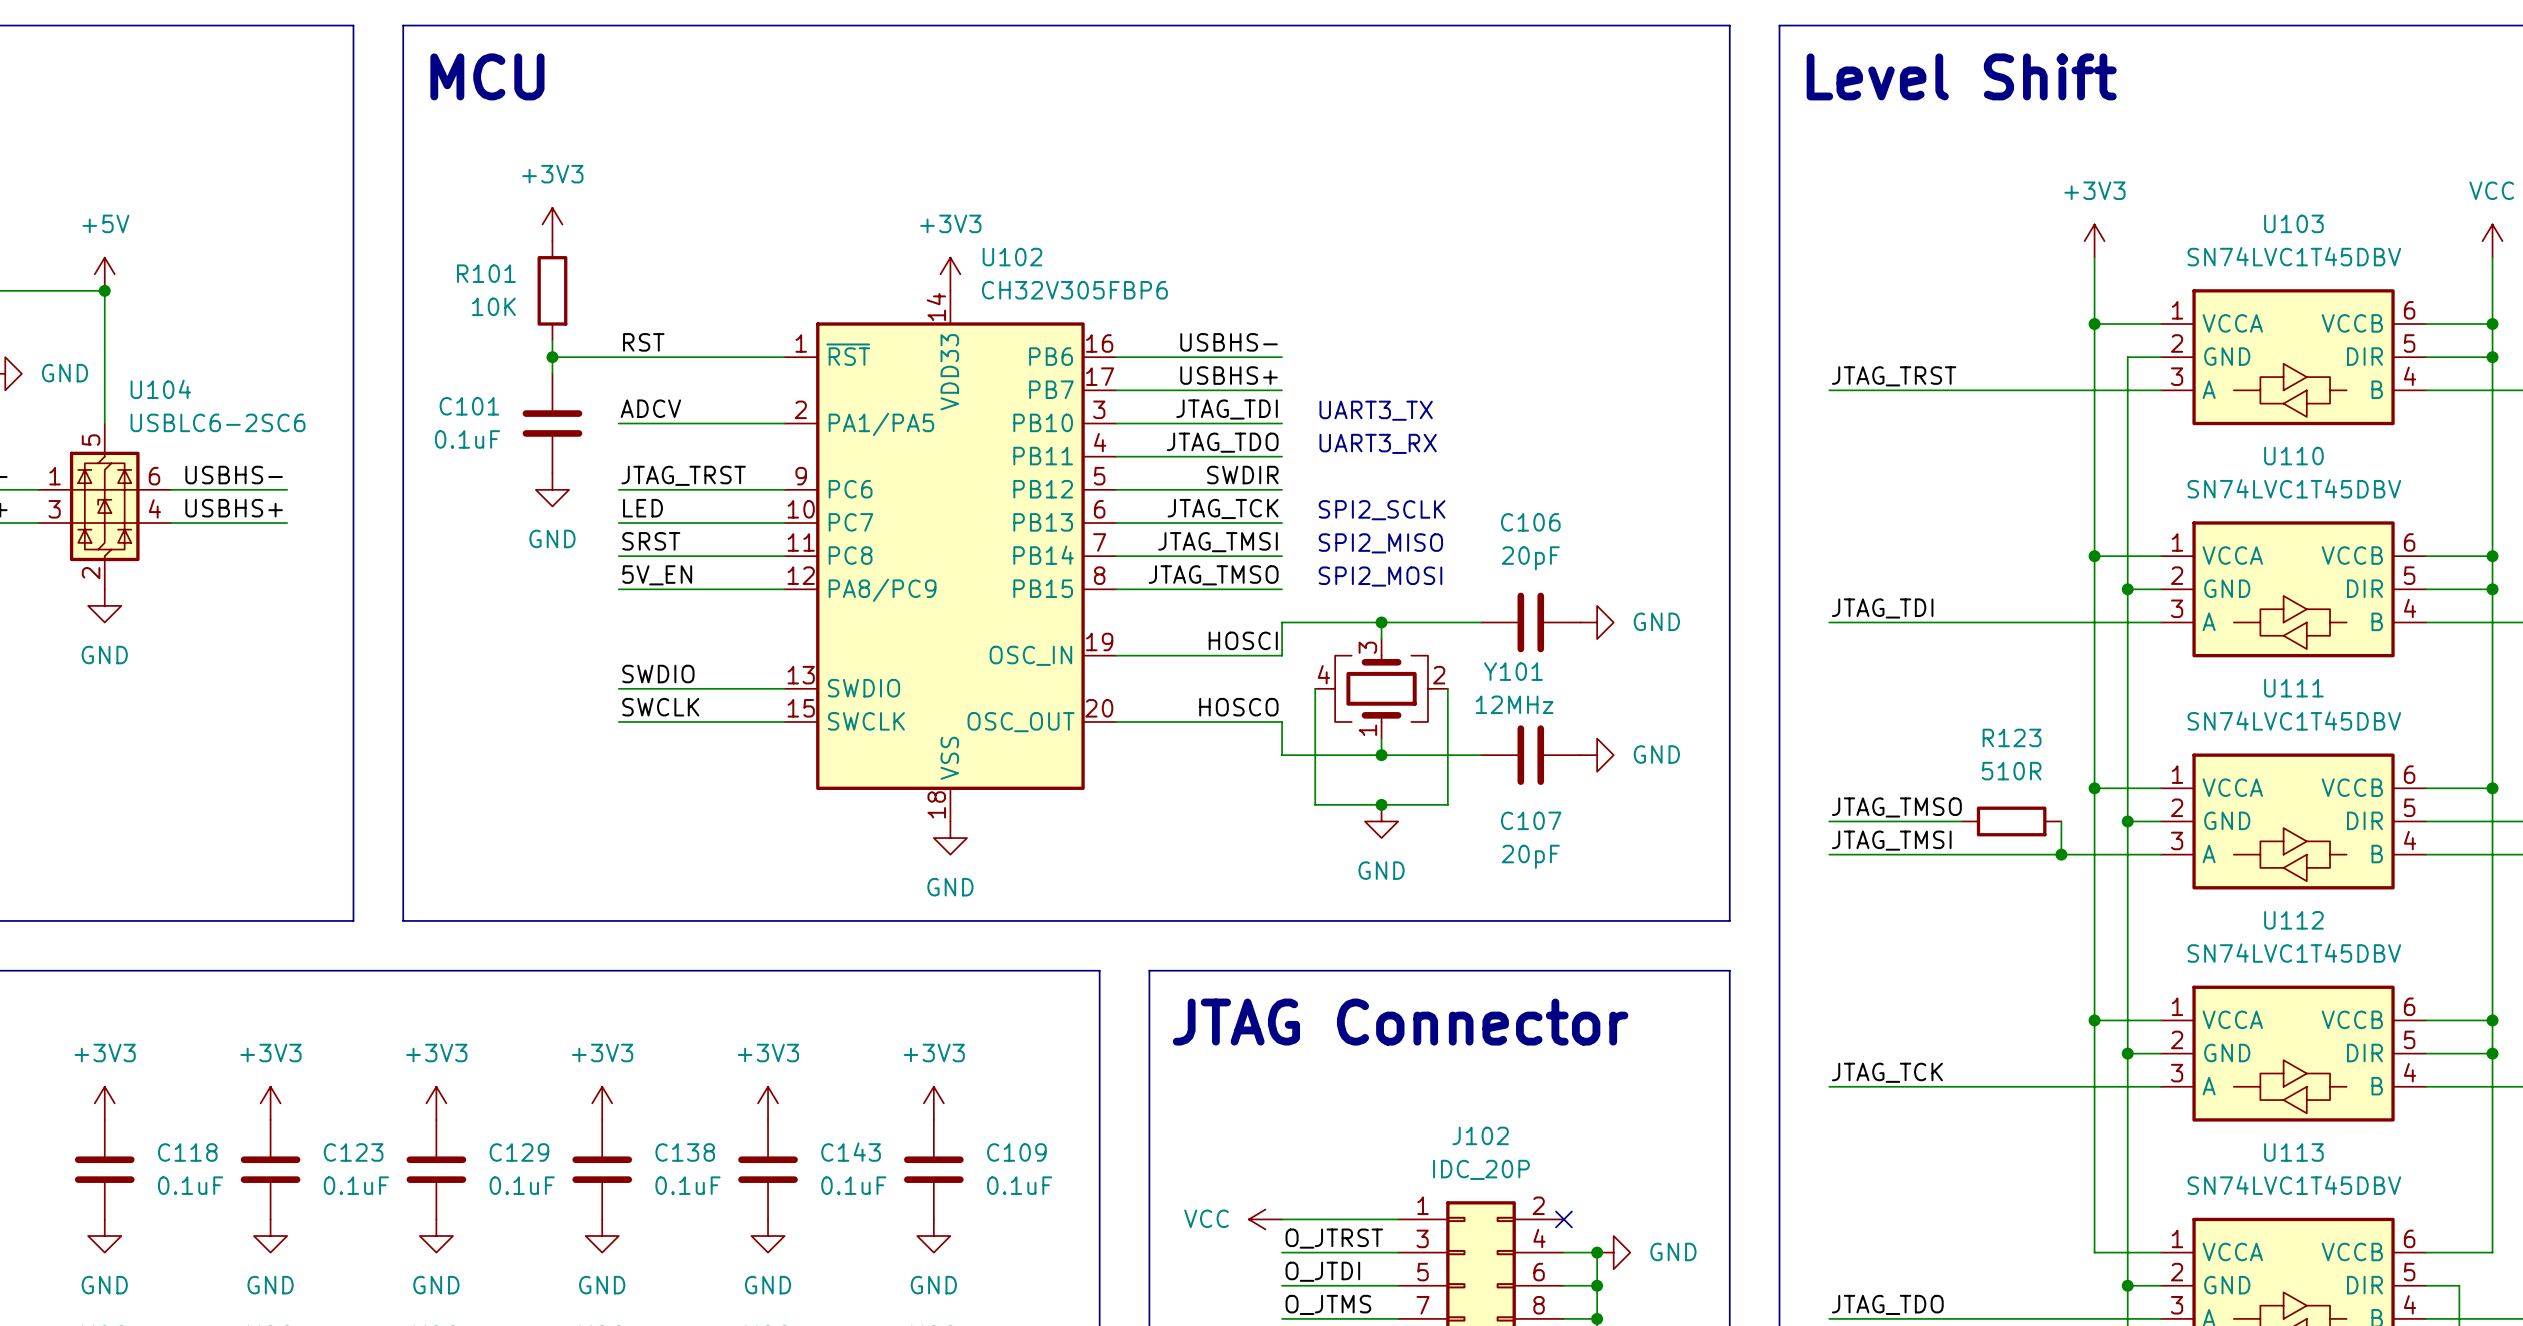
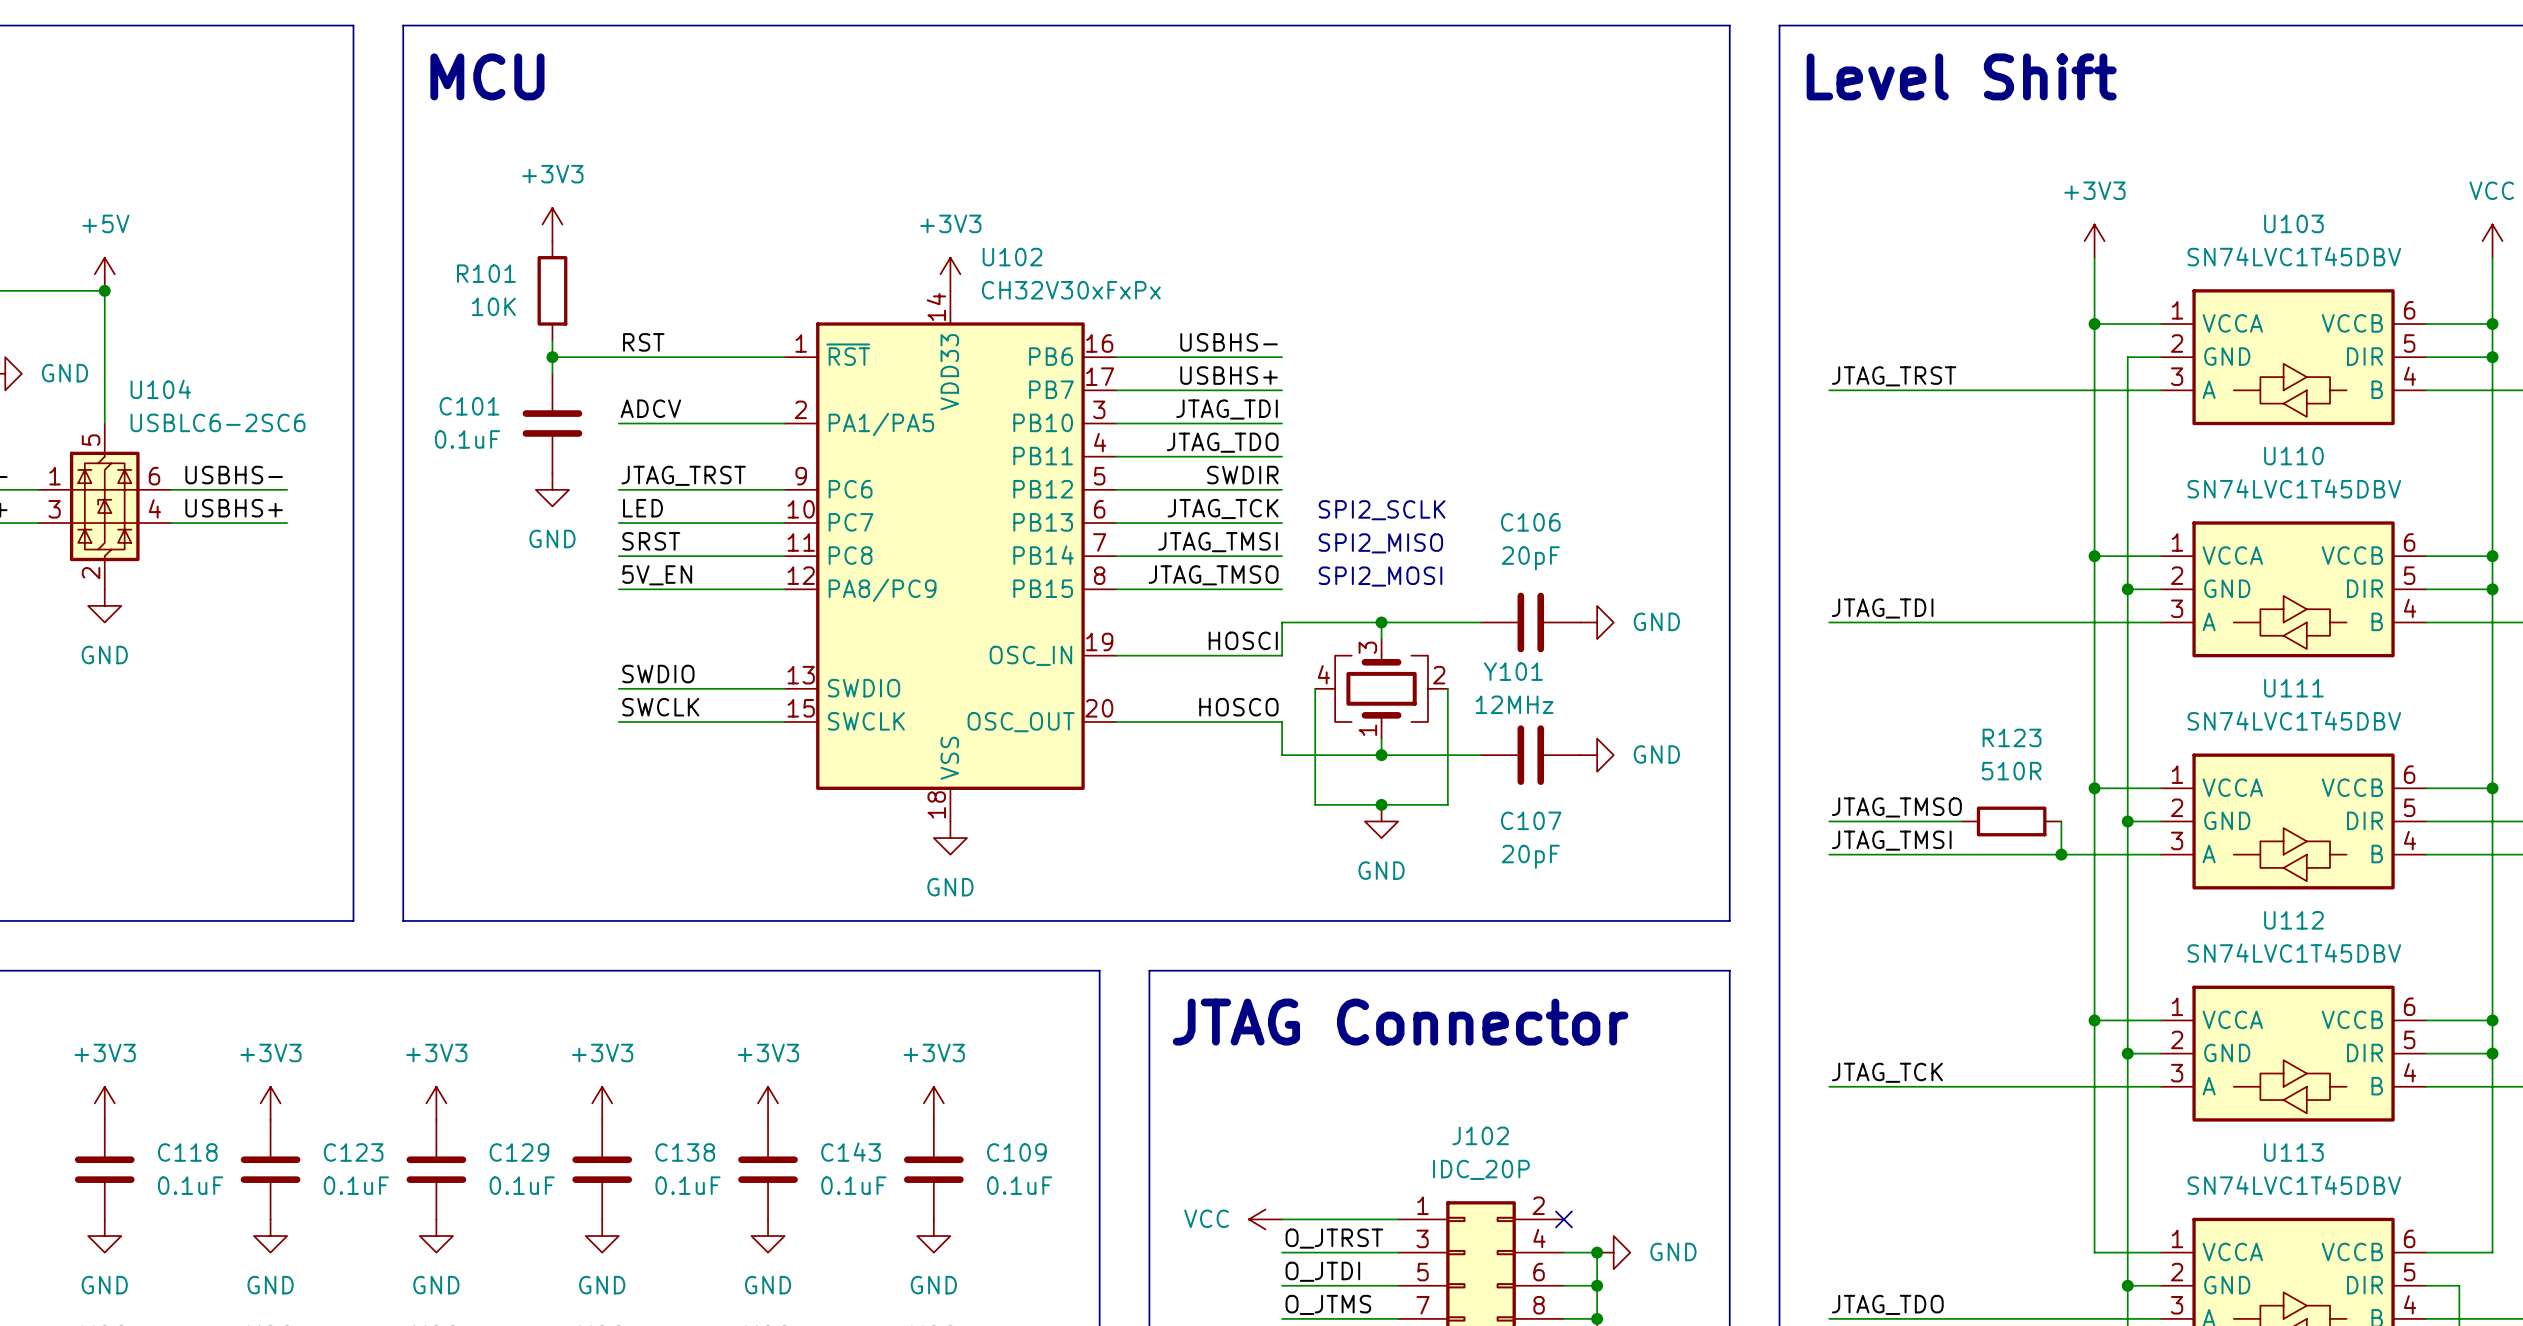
U102 value: CH32V305FBP6 (1074, 290) -> CH32V30xFxPx (1071, 290)
text: UART3_TX (1376, 410) -> none
text: UART3_RX (1378, 443) -> none

